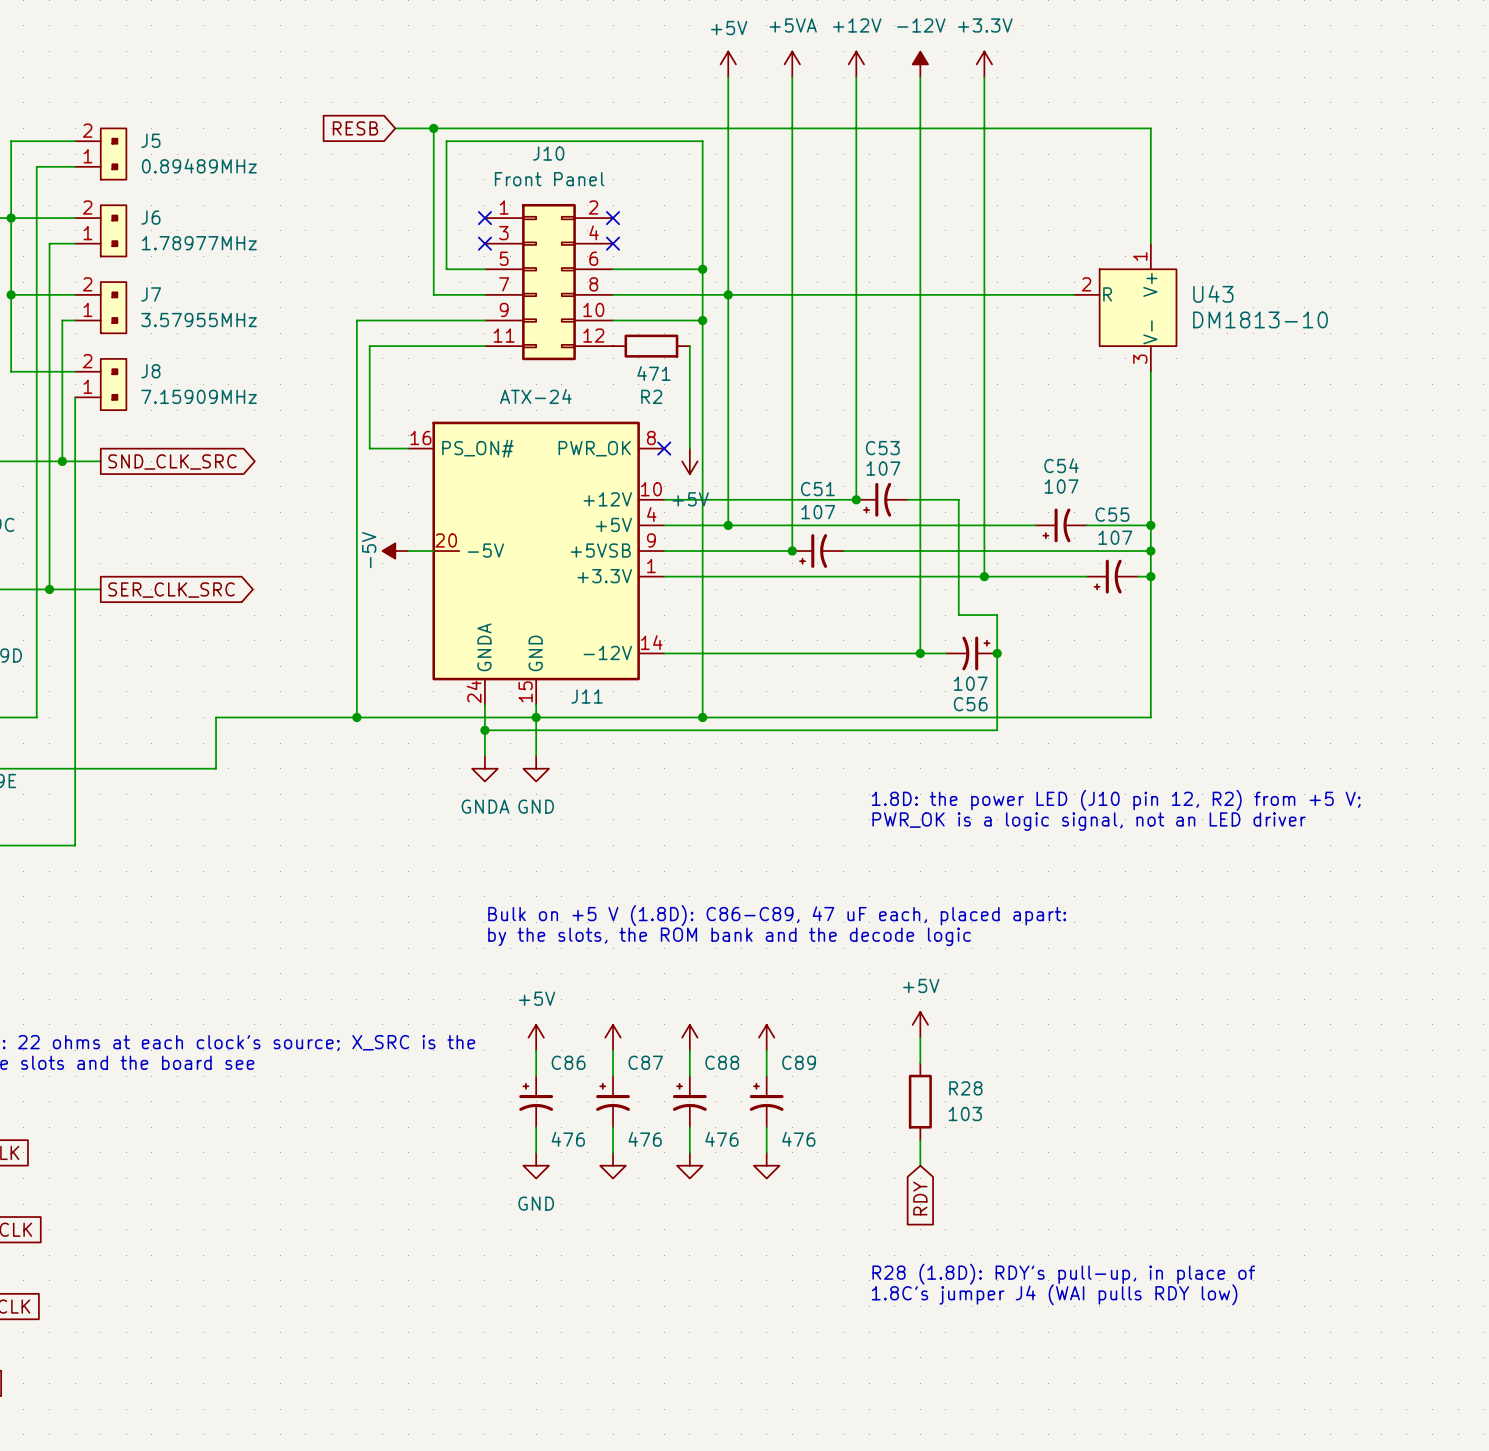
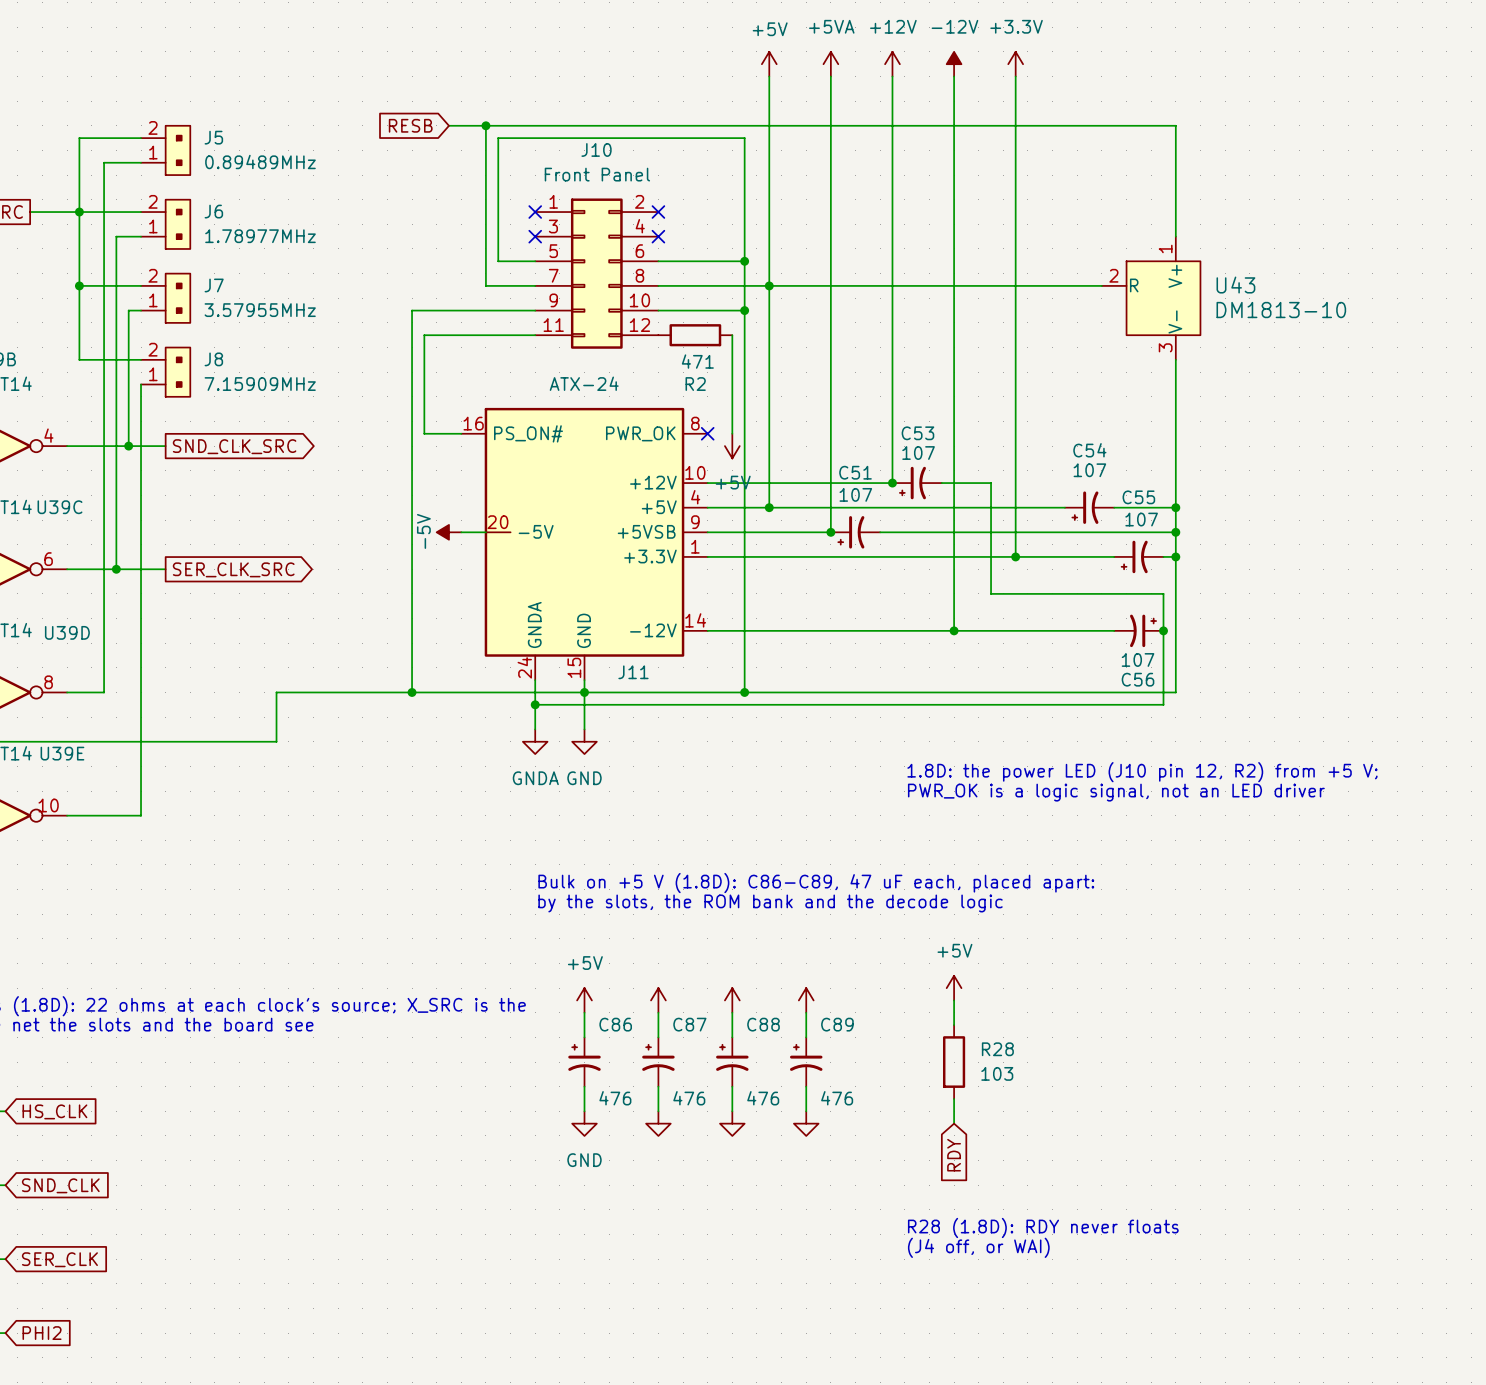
wire: (997, 615) (997, 730) -> (1027, 593) (1163, 593) (1163, 704) (1027, 704)
wire: none -> (978, 630) (1114, 630)
C56 position: (971, 653) -> (1138, 630)
junction: (997, 653) -> none
junction: none -> (1163, 630)
text: R28 (1.8D): RDY's pull-up, in place of (1063, 1274) -> R28 (1.8D): RDY never floats (1043, 1227)
text: 1.8C's jumper J4 (WAI pulls RDY low) (1054, 1294) -> (J4 off, or WAI) (978, 1247)

